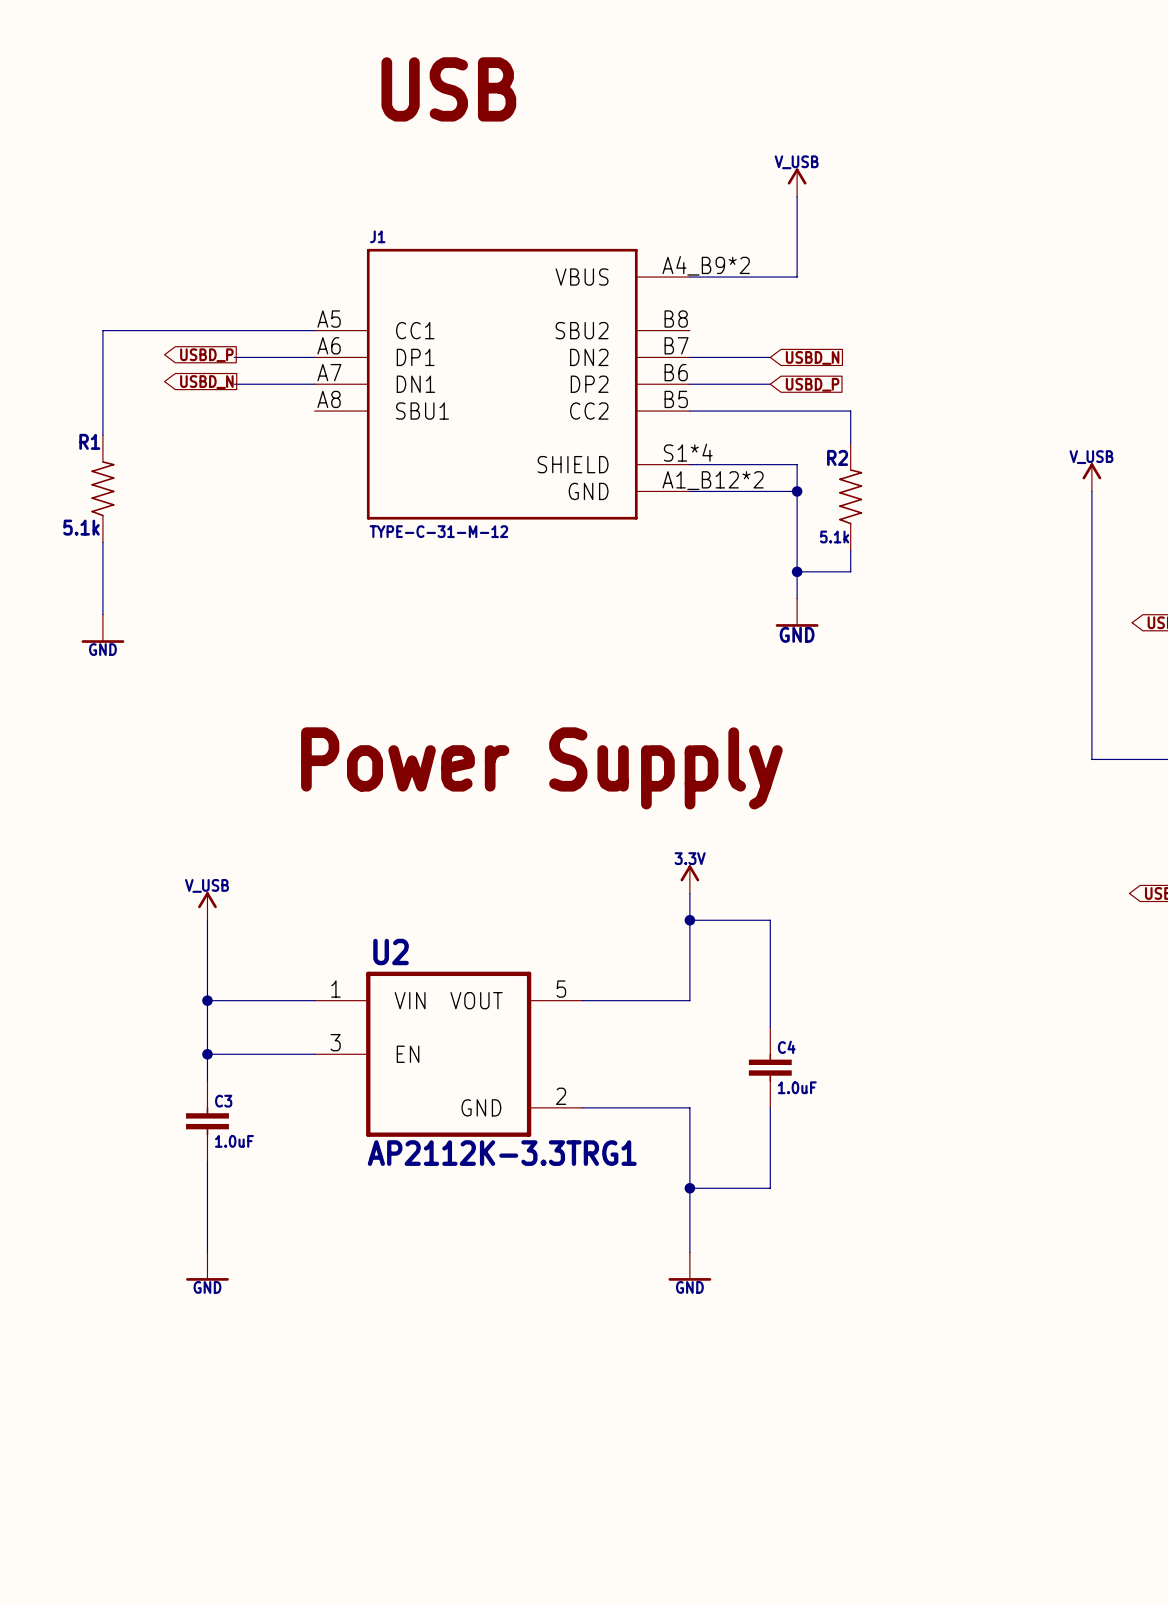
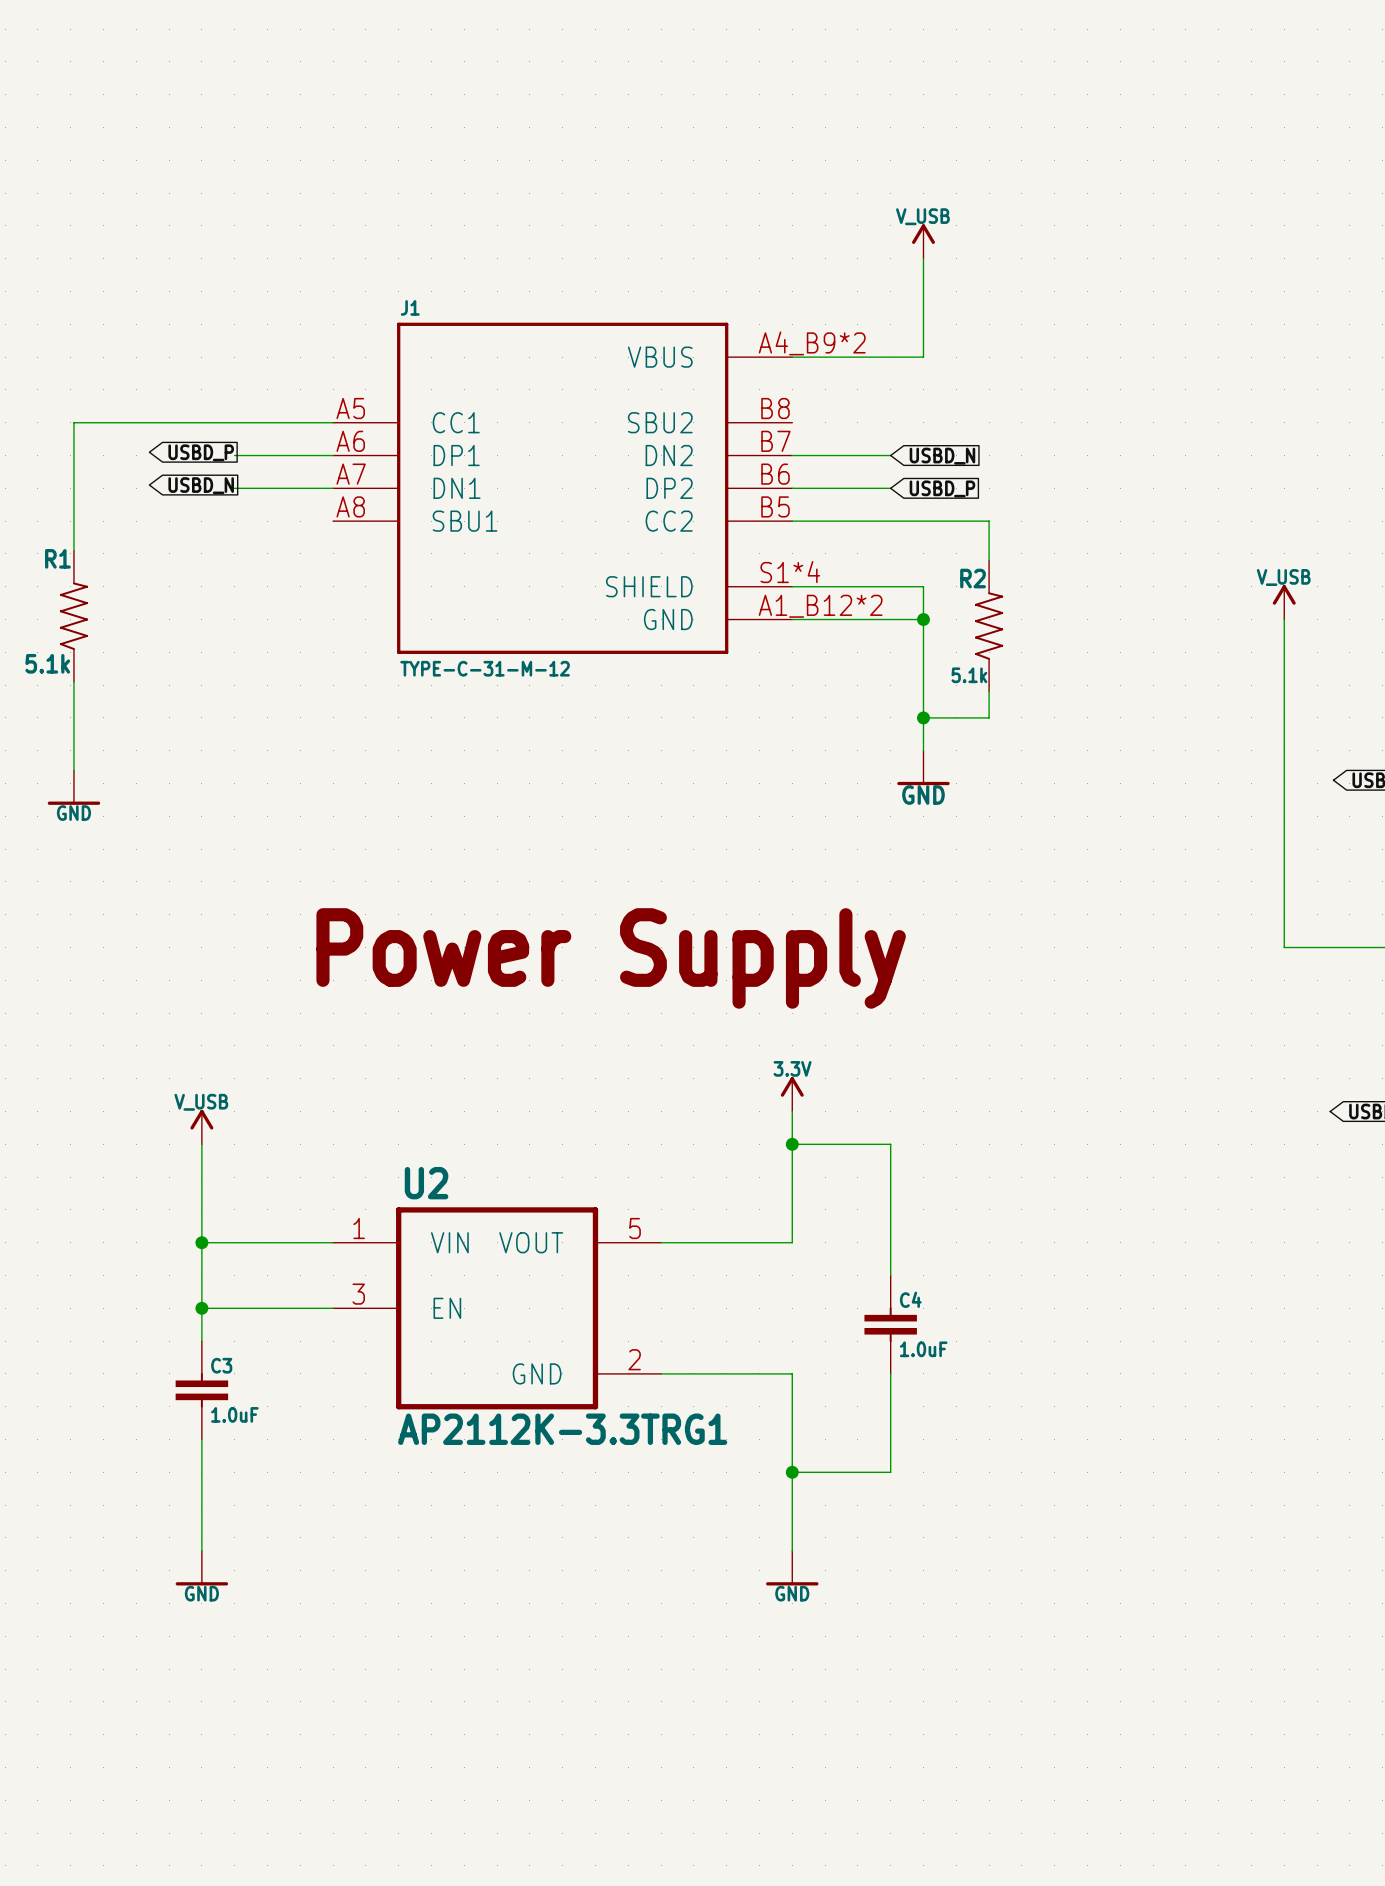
text: USB (448, 89) -> none

